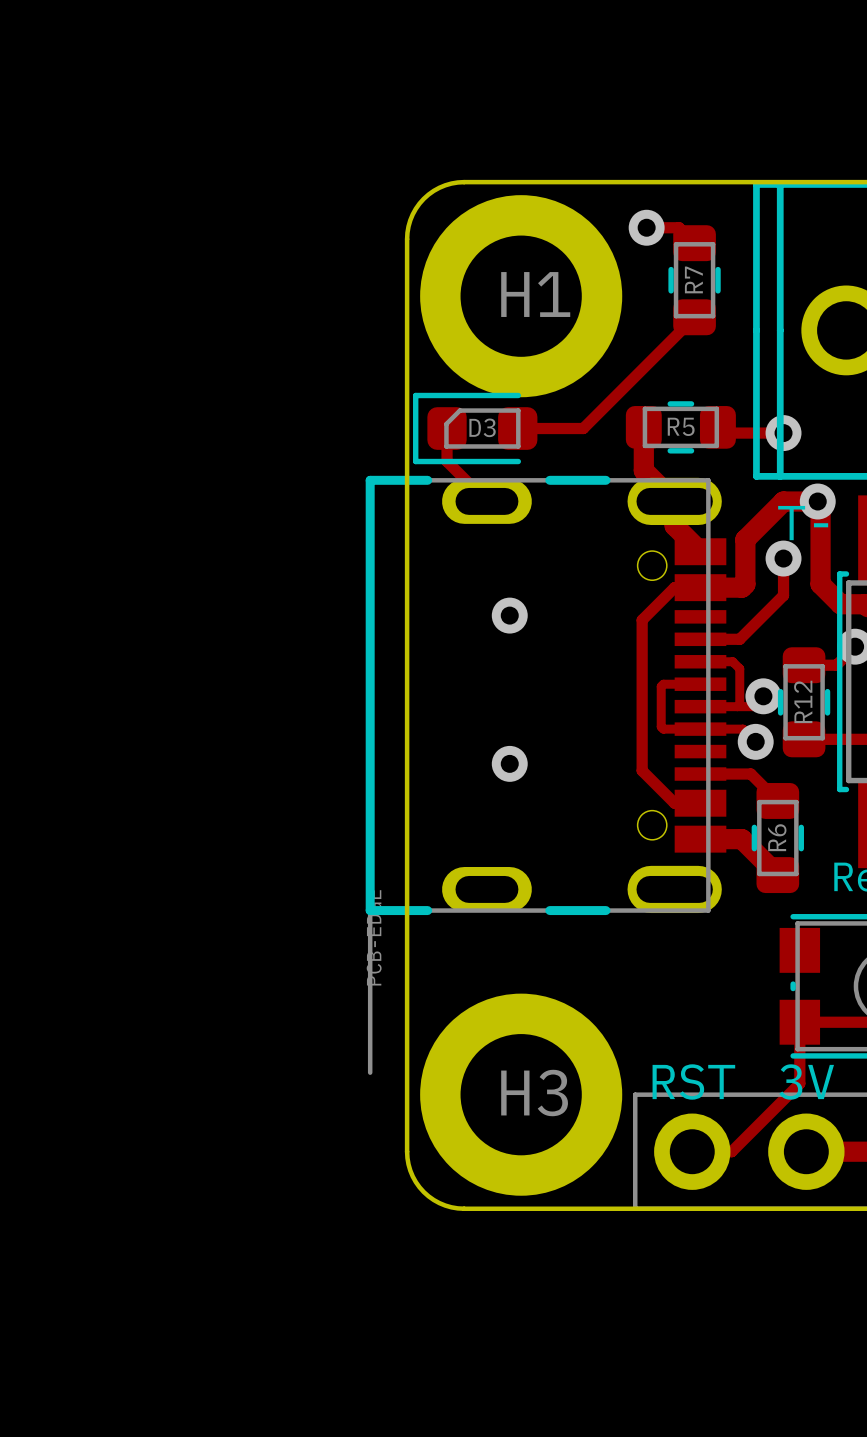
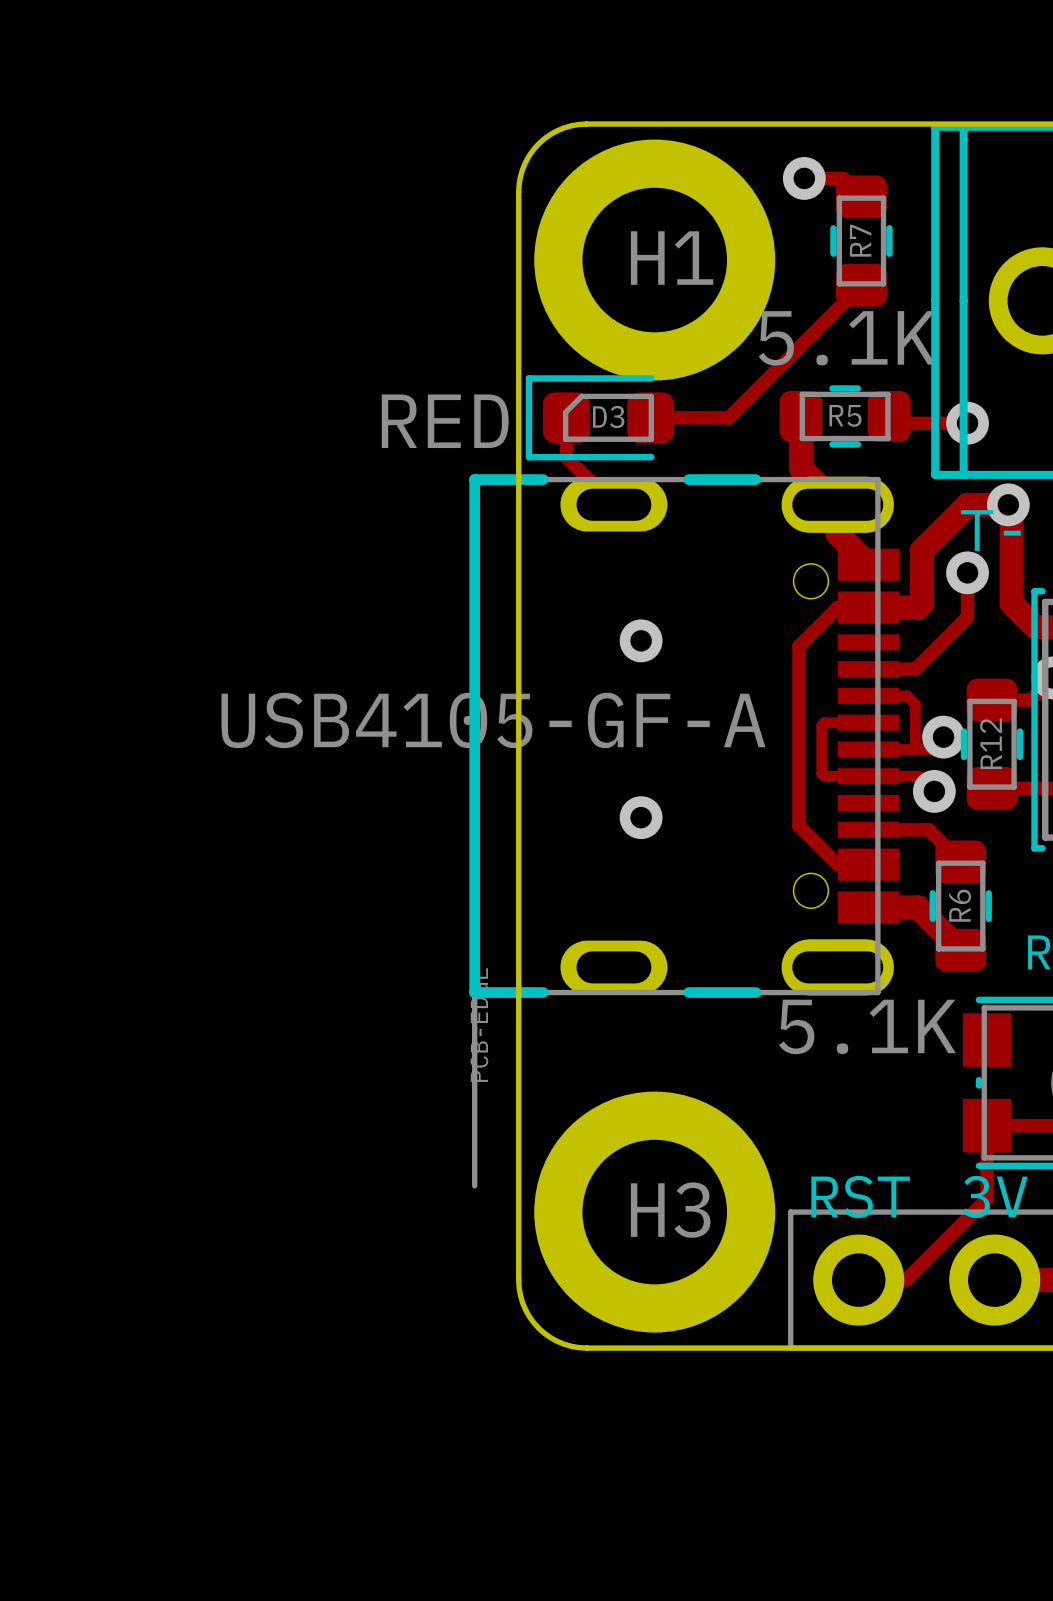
R5 value: none -> 5.1K (847, 338)
D3 value: none -> RED (445, 421)
part value: none -> USB4105-GF-A (493, 720)
R6 value: none -> 5.1K (867, 1026)

